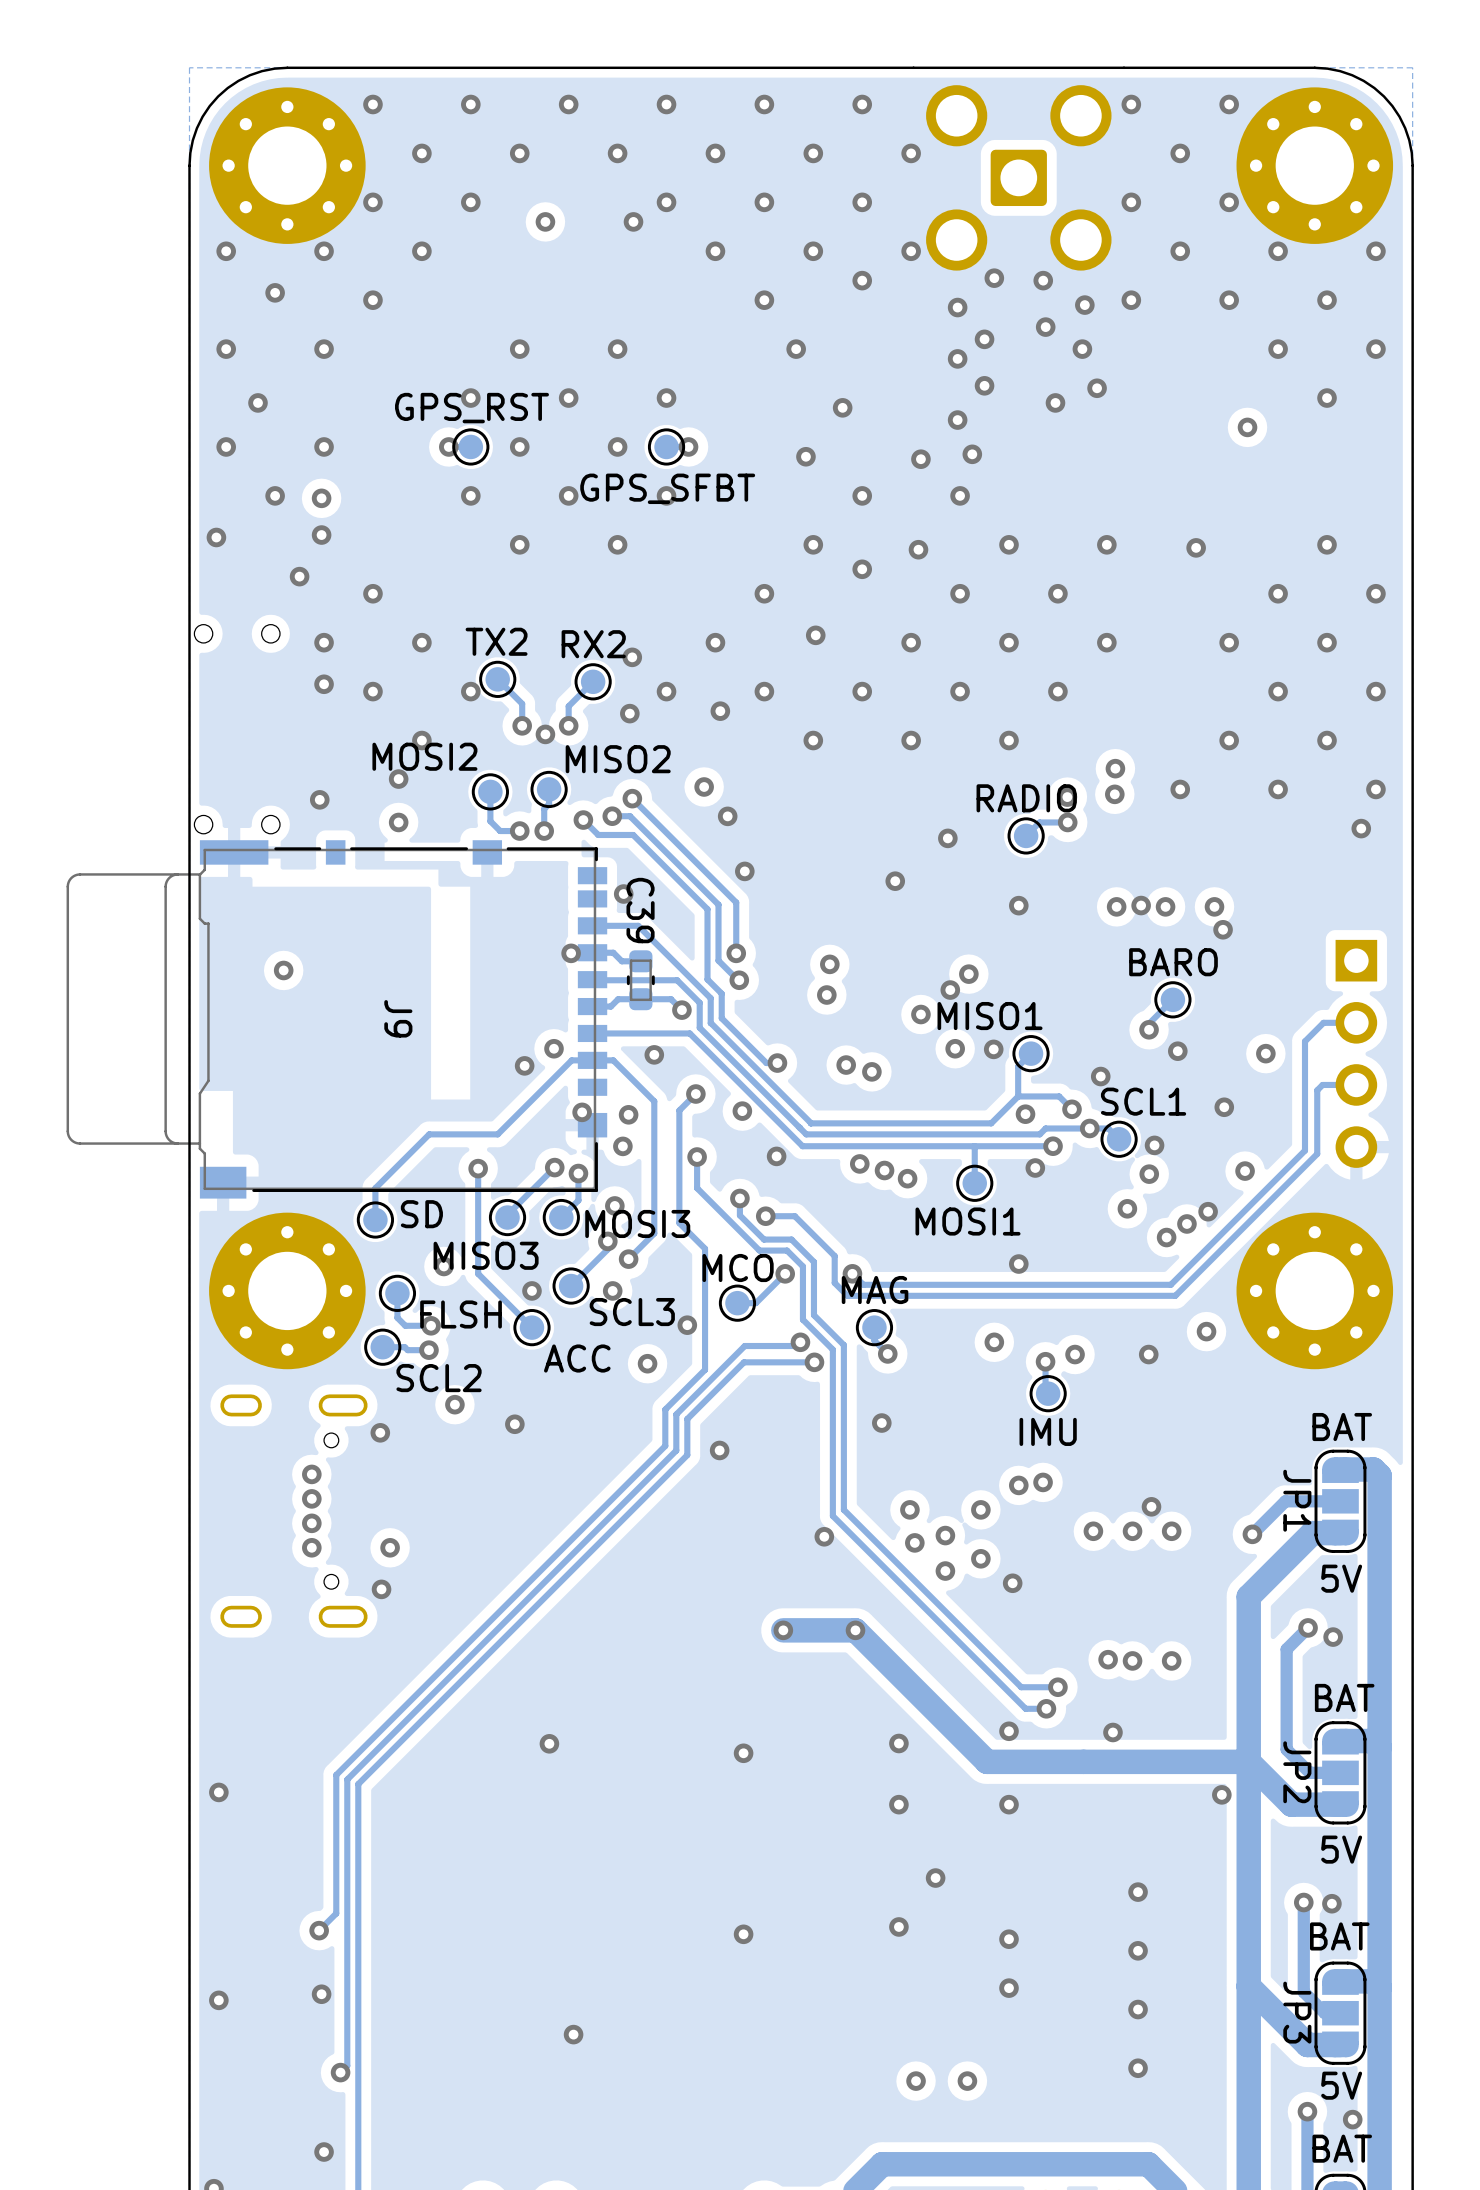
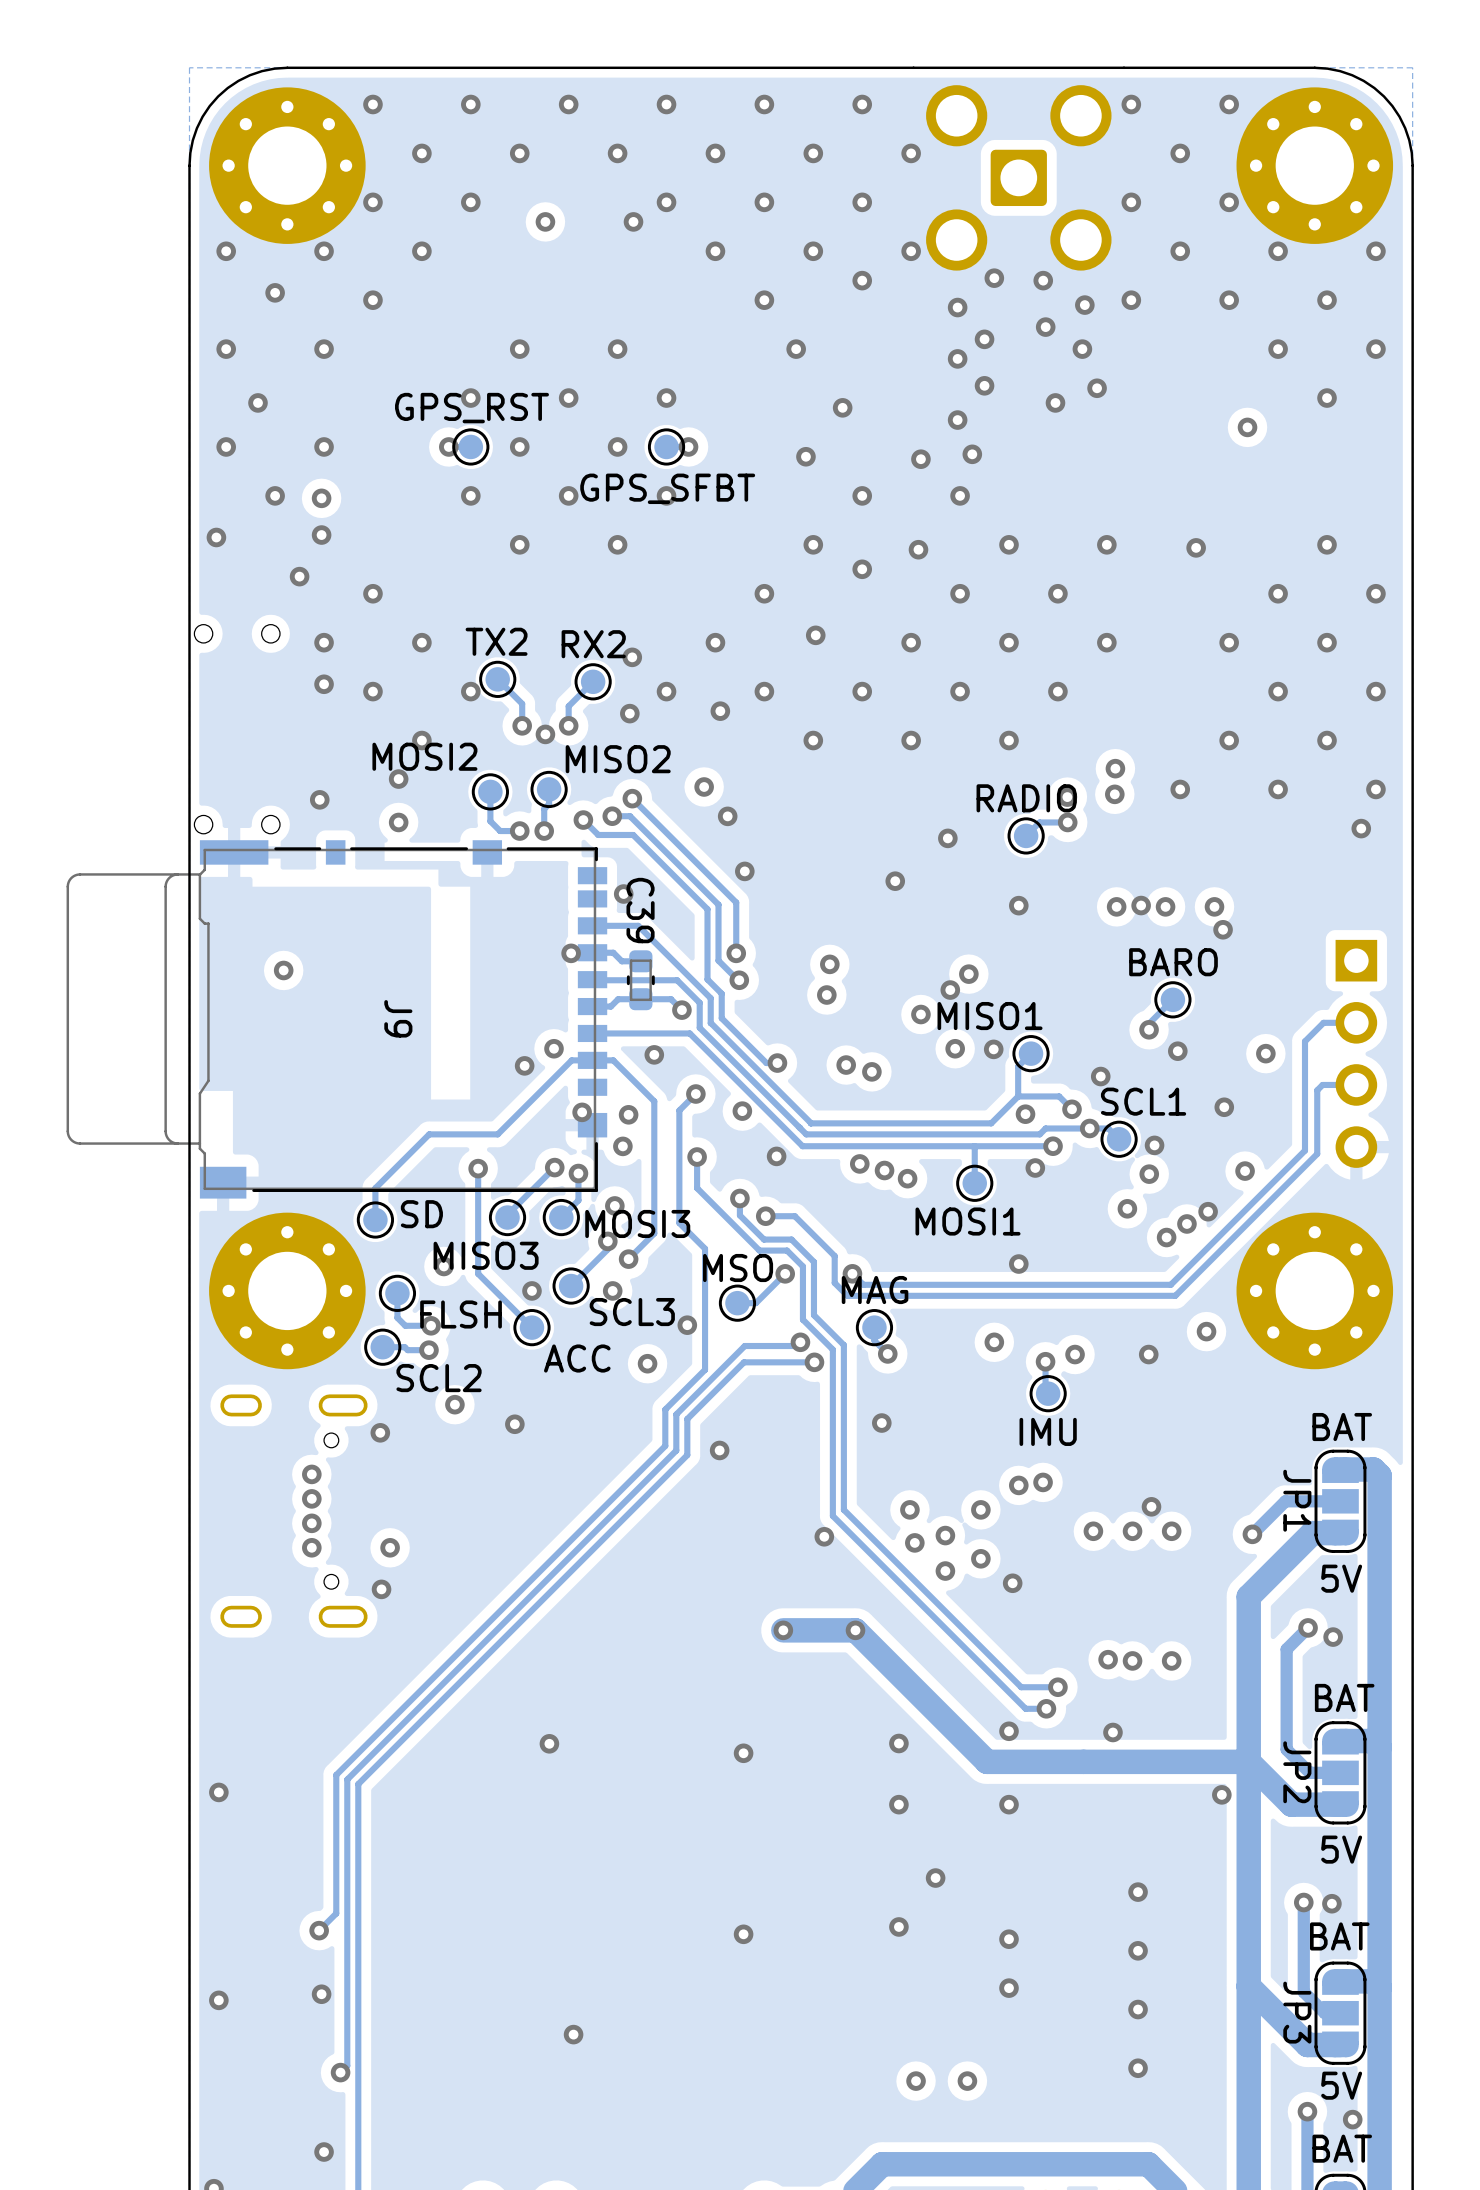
part text: MCO (738, 1268) -> MSO (738, 1268)

